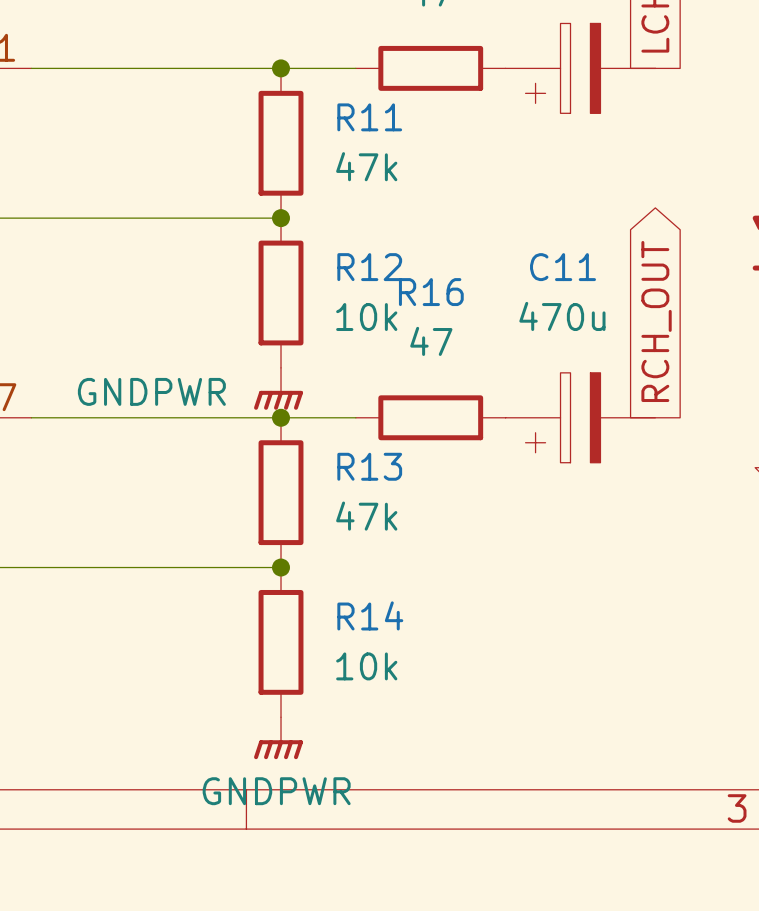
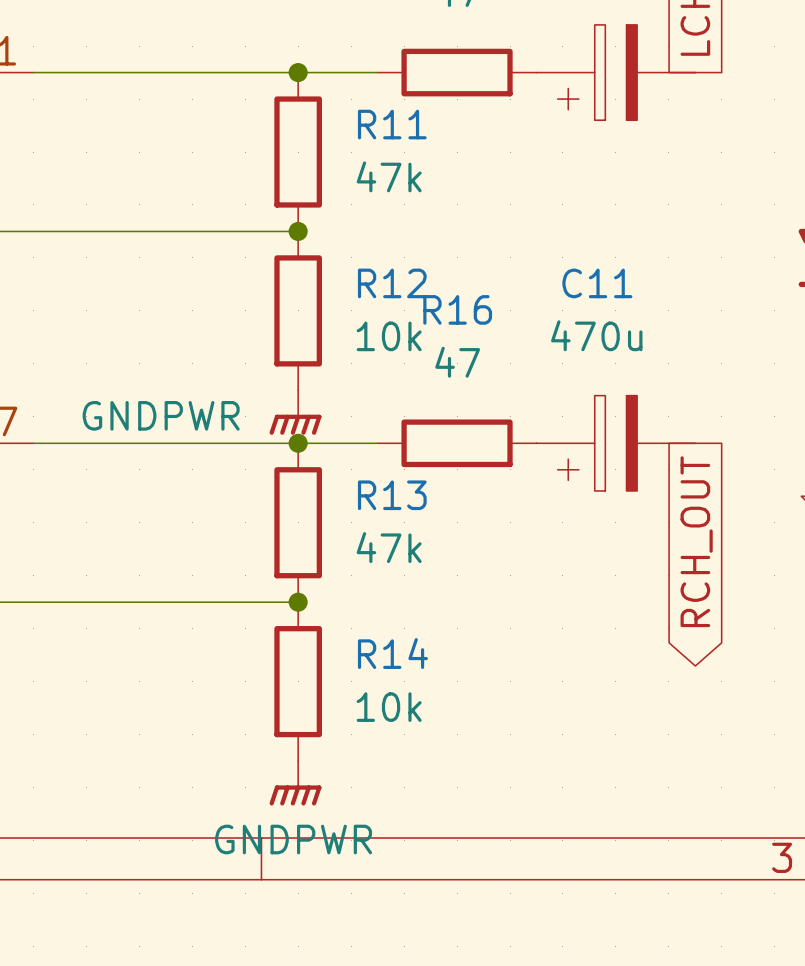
global label rotation: 0° (656, 321) -> 180° (696, 541)

